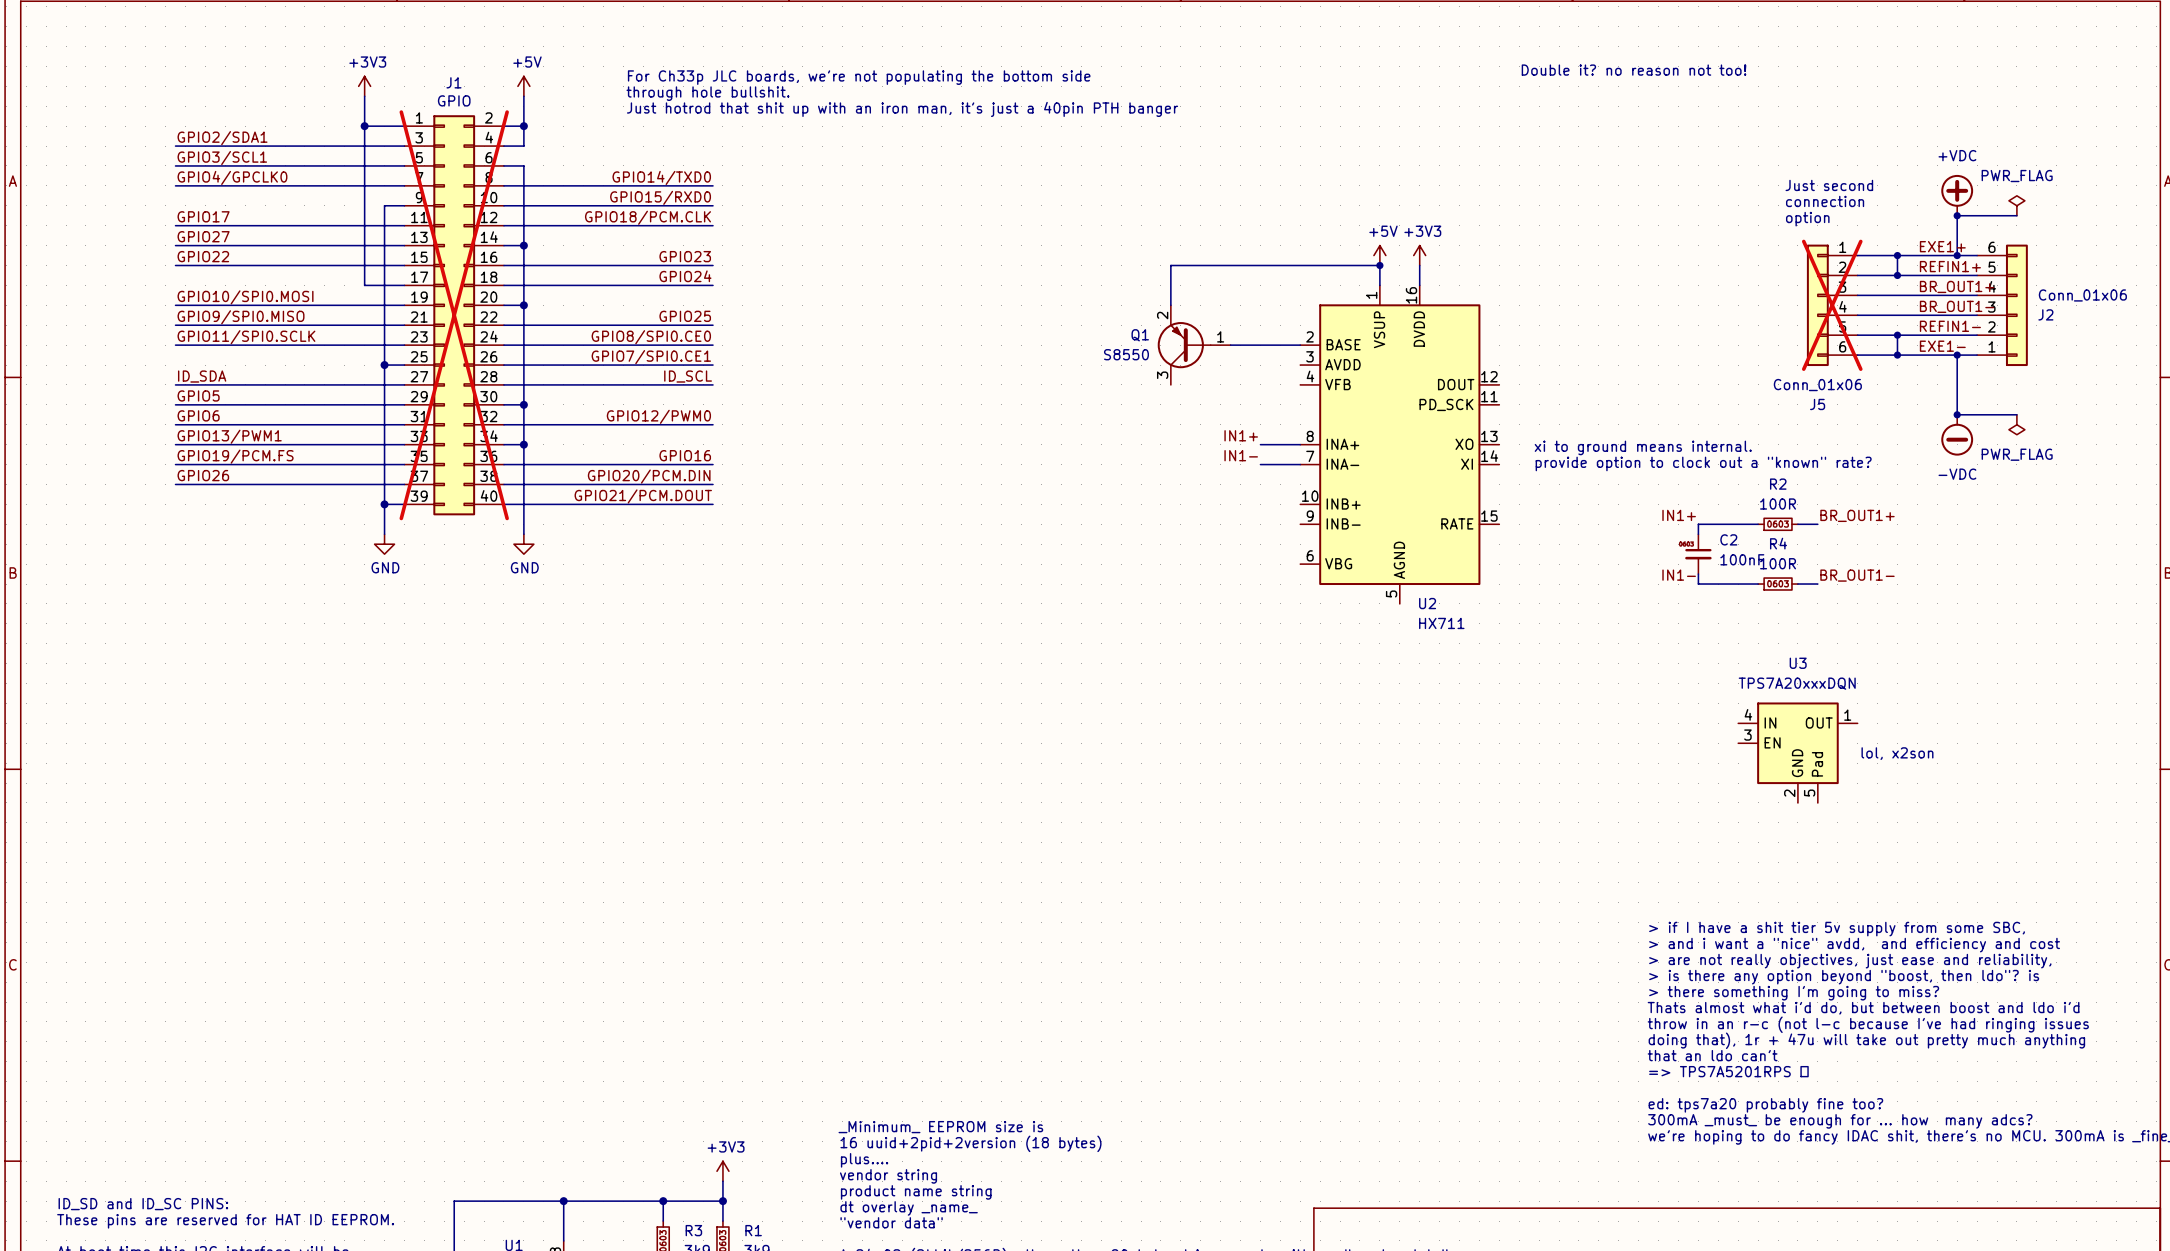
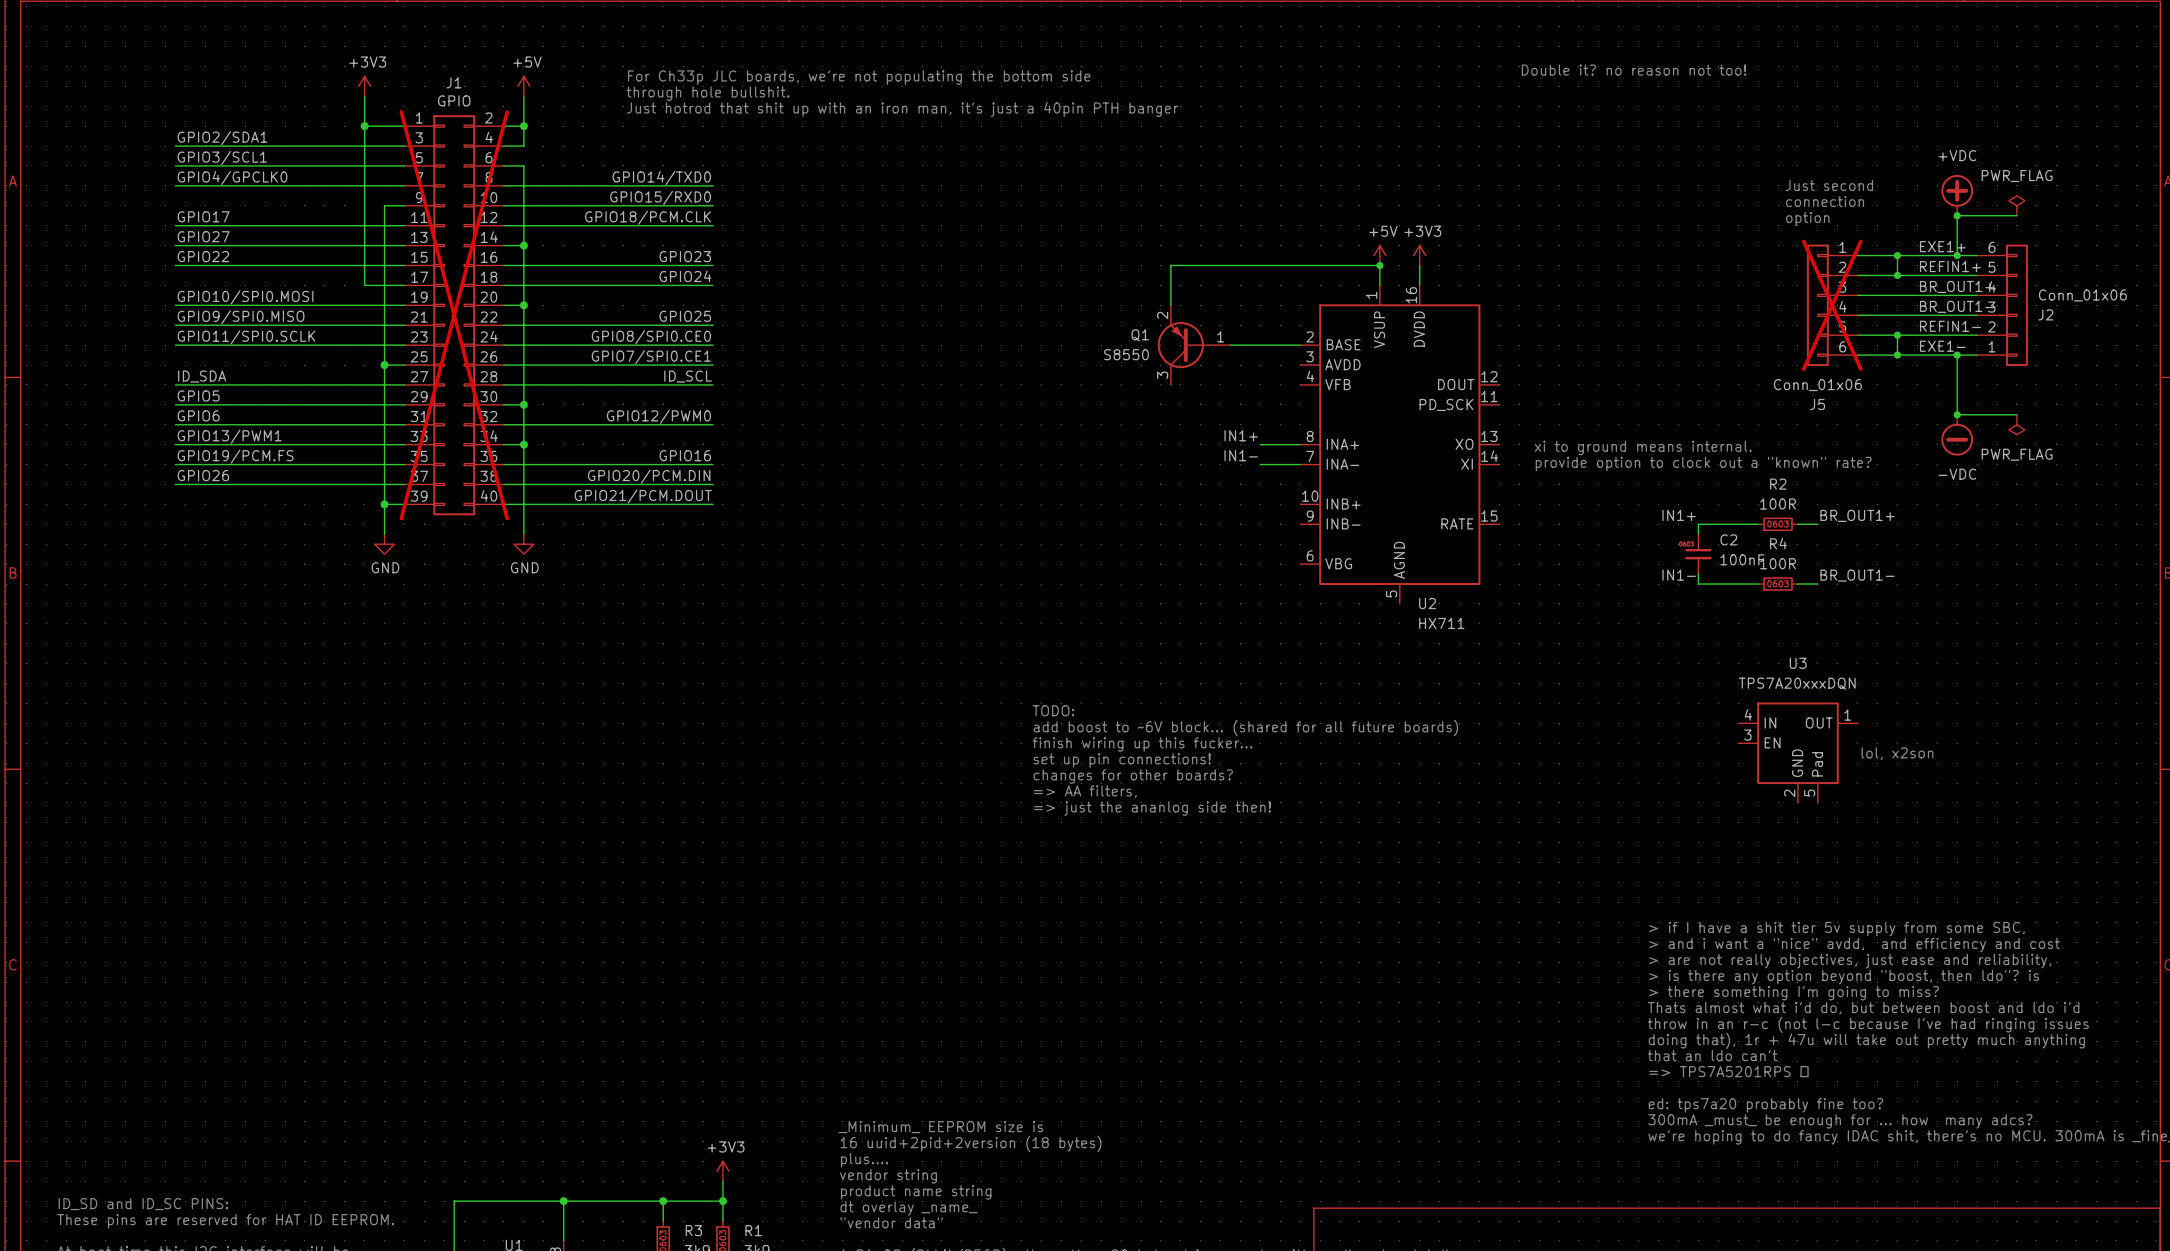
text: none -> TODO: (1053, 710)
text: none -> add boost to ~6V block... (shared for all future boards) (1245, 727)
text: none -> finish wiring up this fucker... (1142, 744)
text: none -> set up pin connections! (1122, 760)
text: none -> changes for other boards? (1133, 776)
text: none -> => AA filters, (1085, 791)
text: none -> => just the ananlog side then! (1152, 808)

